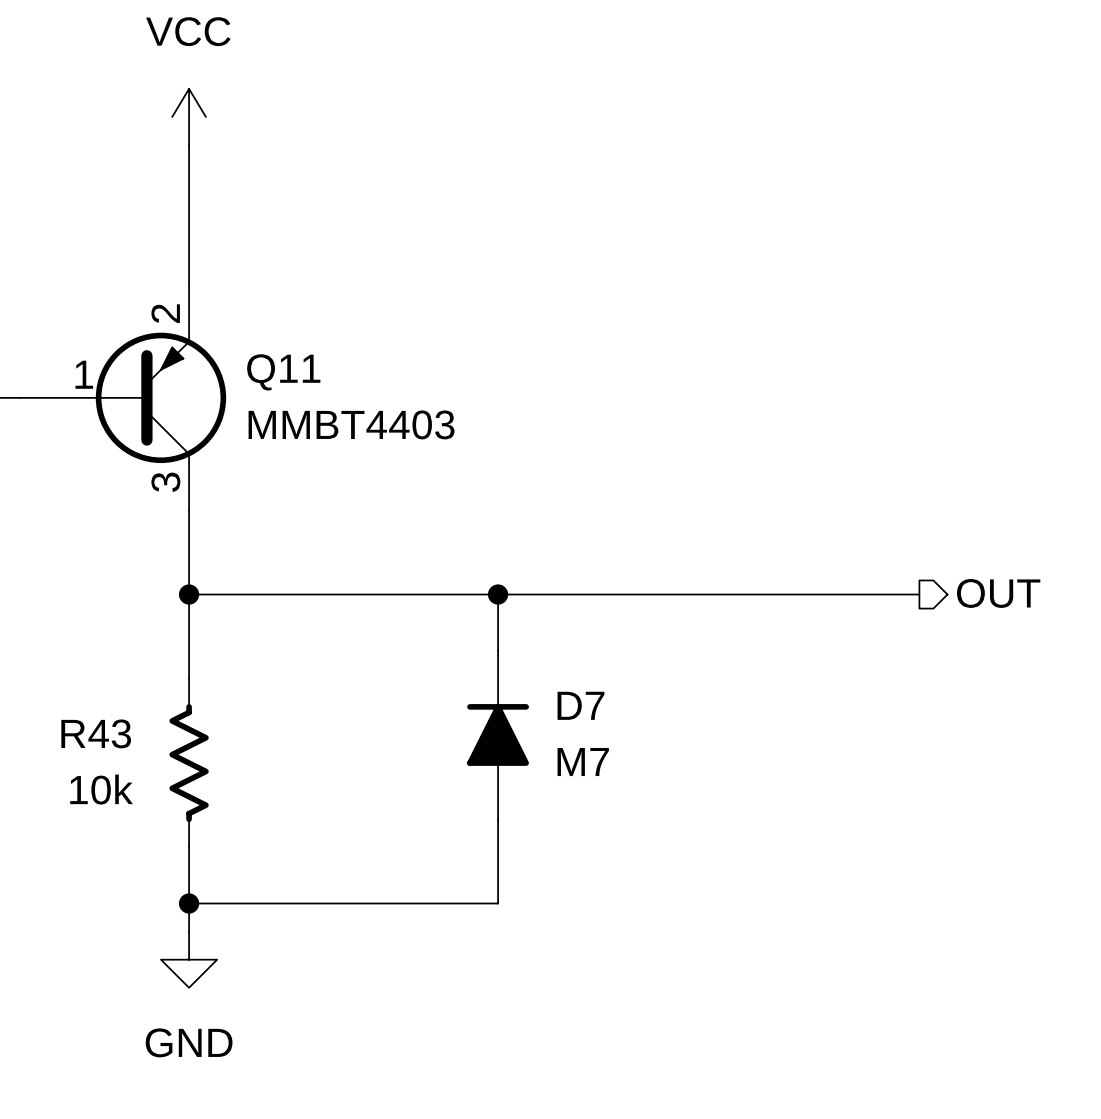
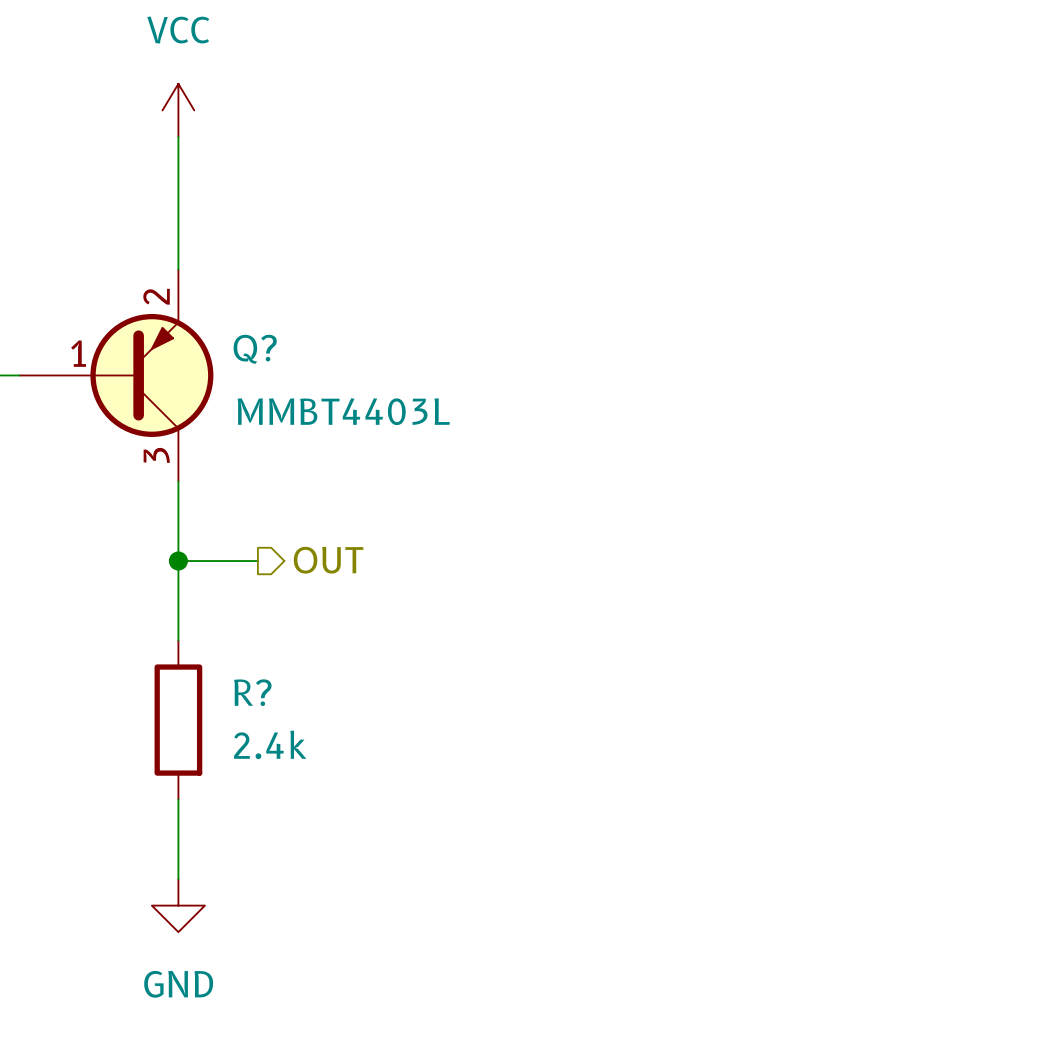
Q11 name: Q11 (283, 372) -> Q? (255, 349)
Q11 value: MMBT4403 (351, 424) -> none
Q11 text: none -> MMBT4403L (343, 411)
hierarchical label: none -> OUT (328, 560)
hierarchical label: OUT (998, 593) -> none
wire: (273, 594) (919, 594) -> none
wire: (498, 594) (498, 650) -> none
junction: (498, 594) -> none
D7: M7 (498, 734) -> none
R43: 10k (189, 763) -> none
R?: none -> 2.4k (178, 720)
wire: (498, 819) (498, 903) (189, 903) -> none
junction: (189, 903) -> none

